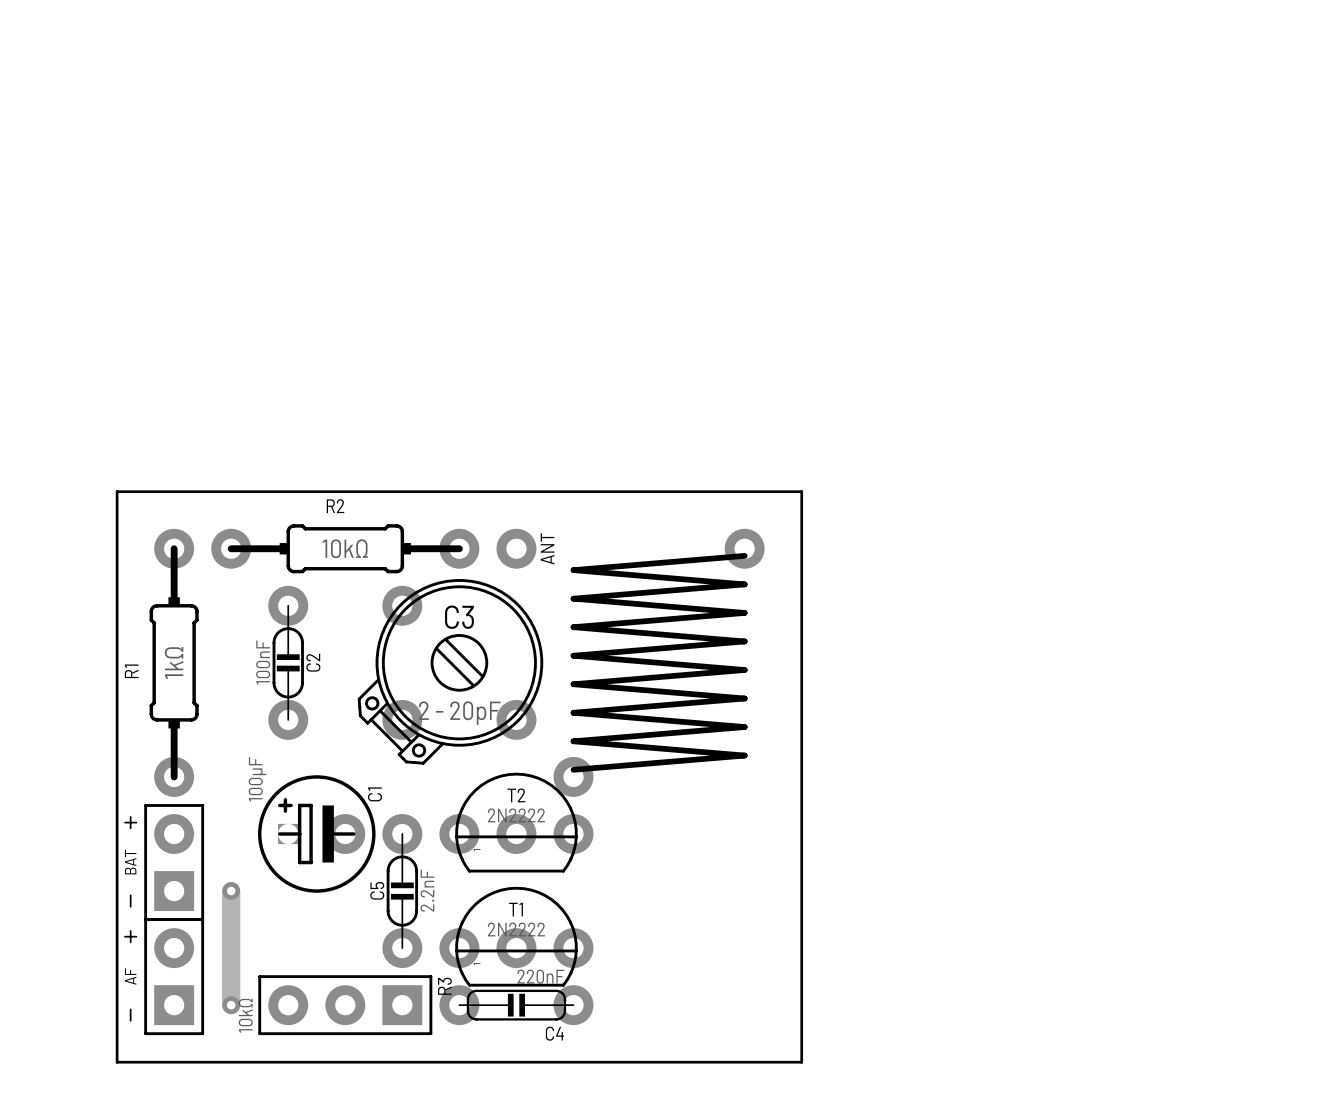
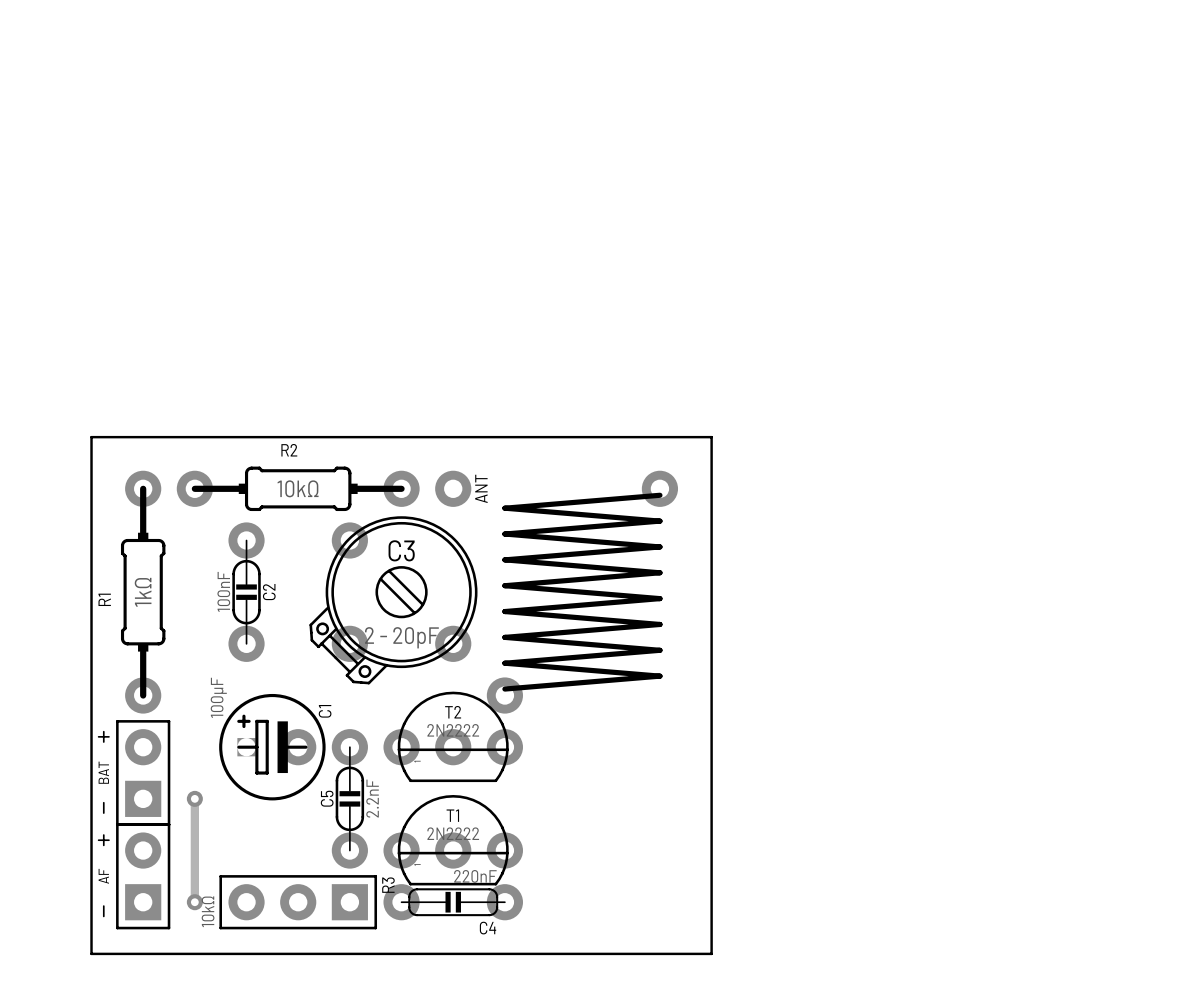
track width: thick (231, 891) (231, 1005) -> thin (194, 798) (194, 902)

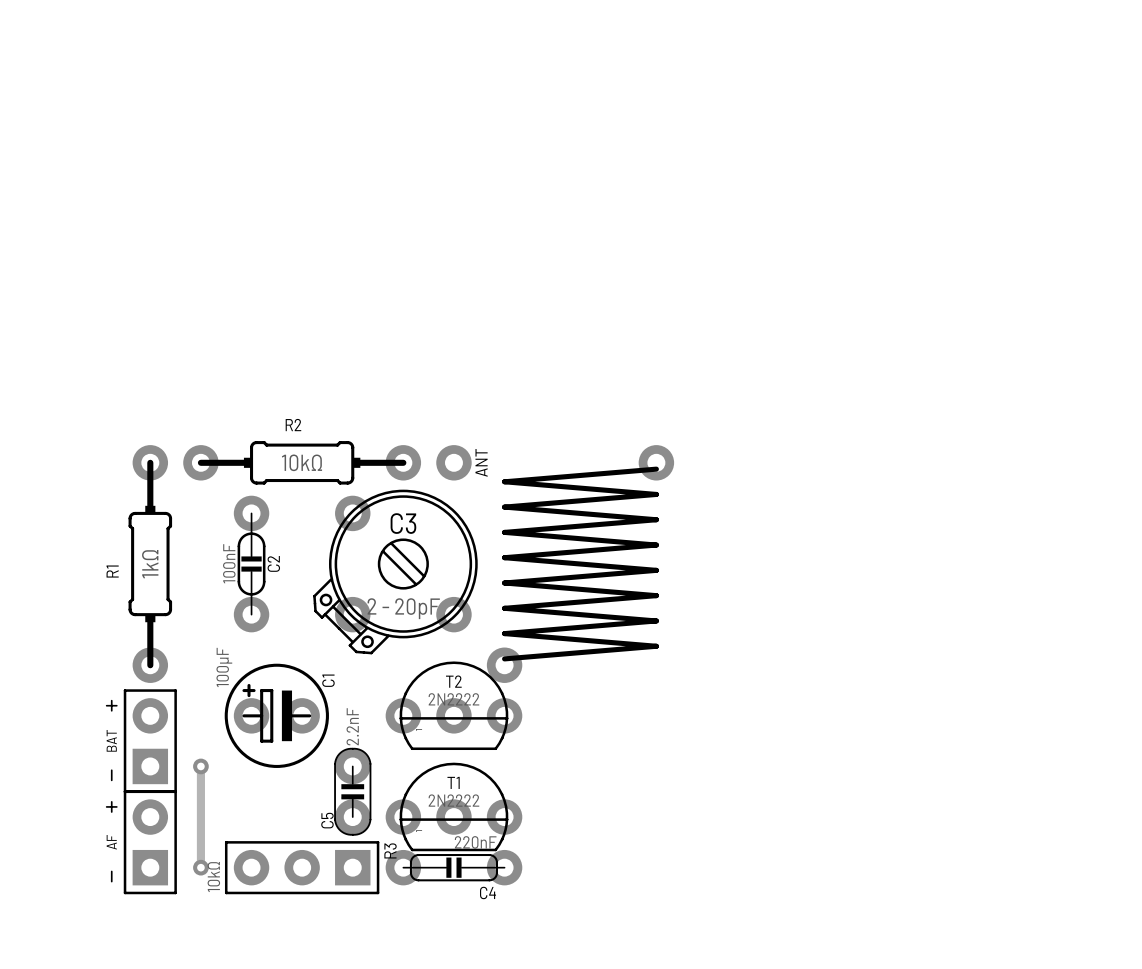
board edge: (91, 437) (91, 953) (711, 953) (711, 437) (91, 437) -> none
C1 footprint: [219, 693, 326, 801] -> [224, 663, 329, 768]
C5 footprint: [331, 729, 368, 869] -> [334, 747, 372, 836]
C5 value position: 2.2nF (372, 798) -> 2.2nF (352, 726)

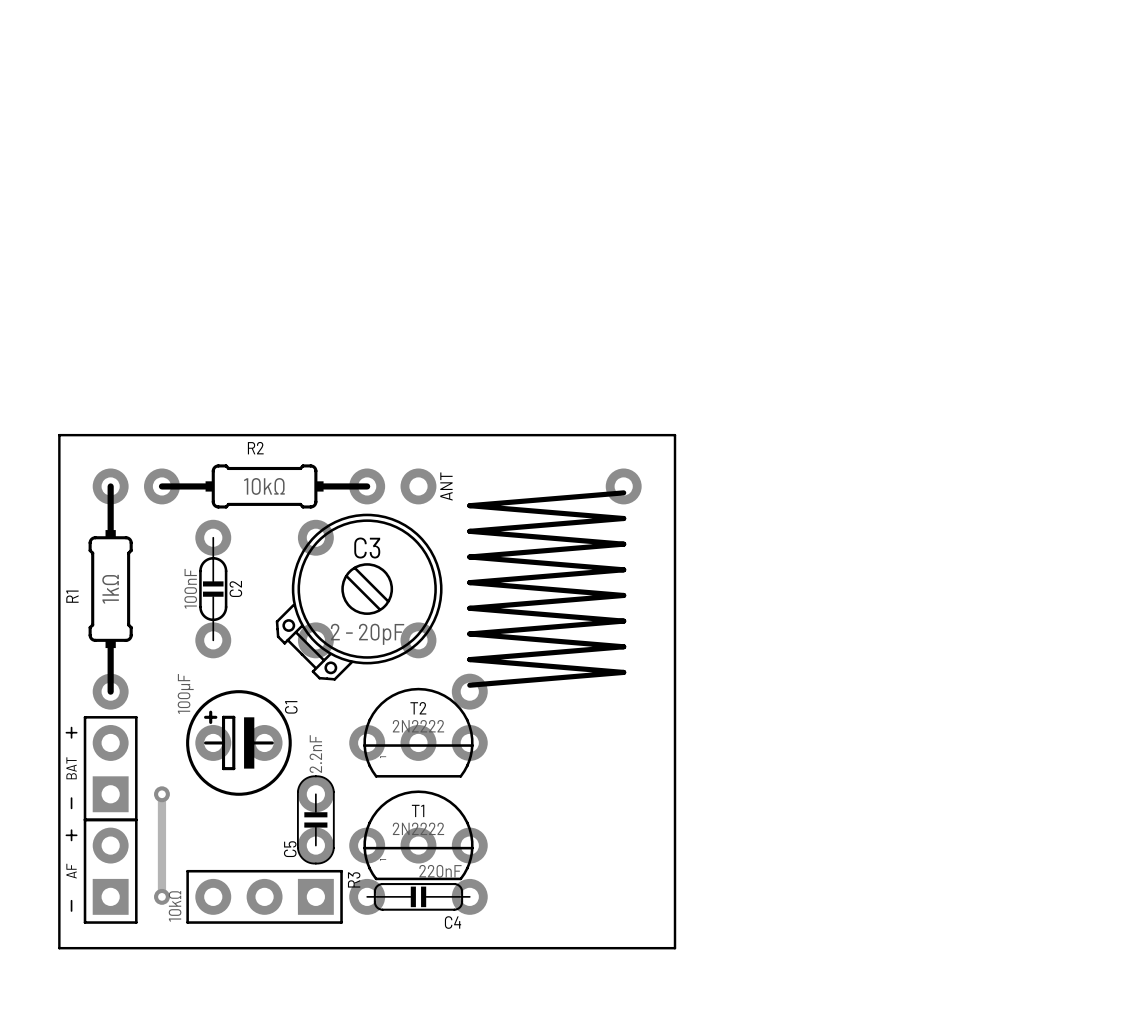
board edge: none -> (59, 435) (59, 948) (675, 948) (675, 435) (59, 435)

